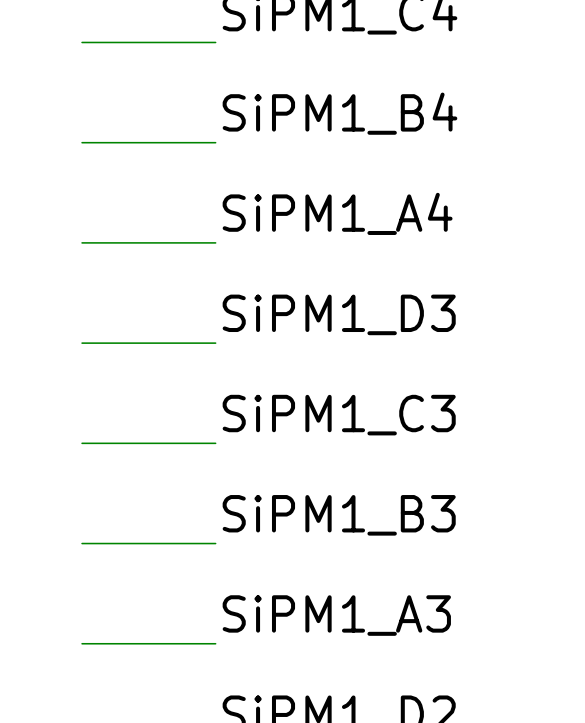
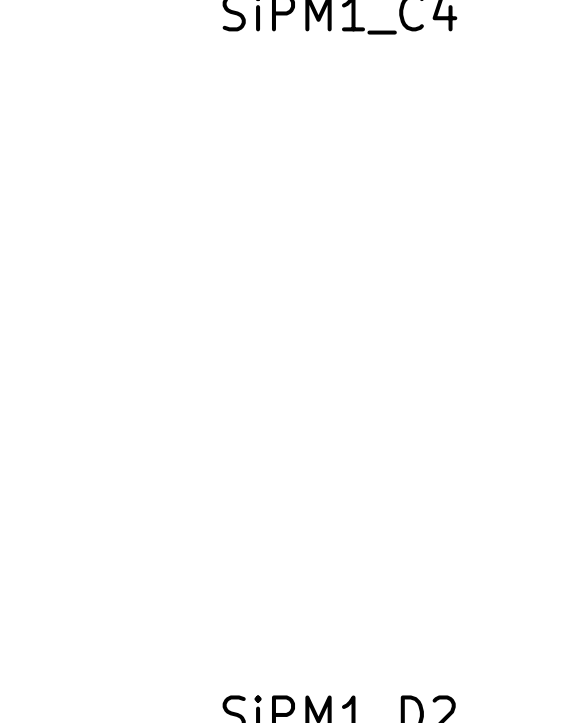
wire: (82, 42) (215, 42) -> none
label: SiPM1_B4 (339, 113) -> none
wire: (82, 142) (215, 142) -> none
label: SiPM1_A4 (337, 213) -> none
wire: (82, 242) (215, 242) -> none
label: SiPM1_D3 (339, 314) -> none
wire: (82, 343) (215, 343) -> none
label: SiPM1_C3 (339, 415) -> none
wire: (82, 443) (215, 443) -> none
label: SiPM1_B3 (339, 515) -> none
wire: (82, 543) (215, 543) -> none
label: SiPM1_A3 (336, 615) -> none
wire: (82, 643) (215, 643) -> none

